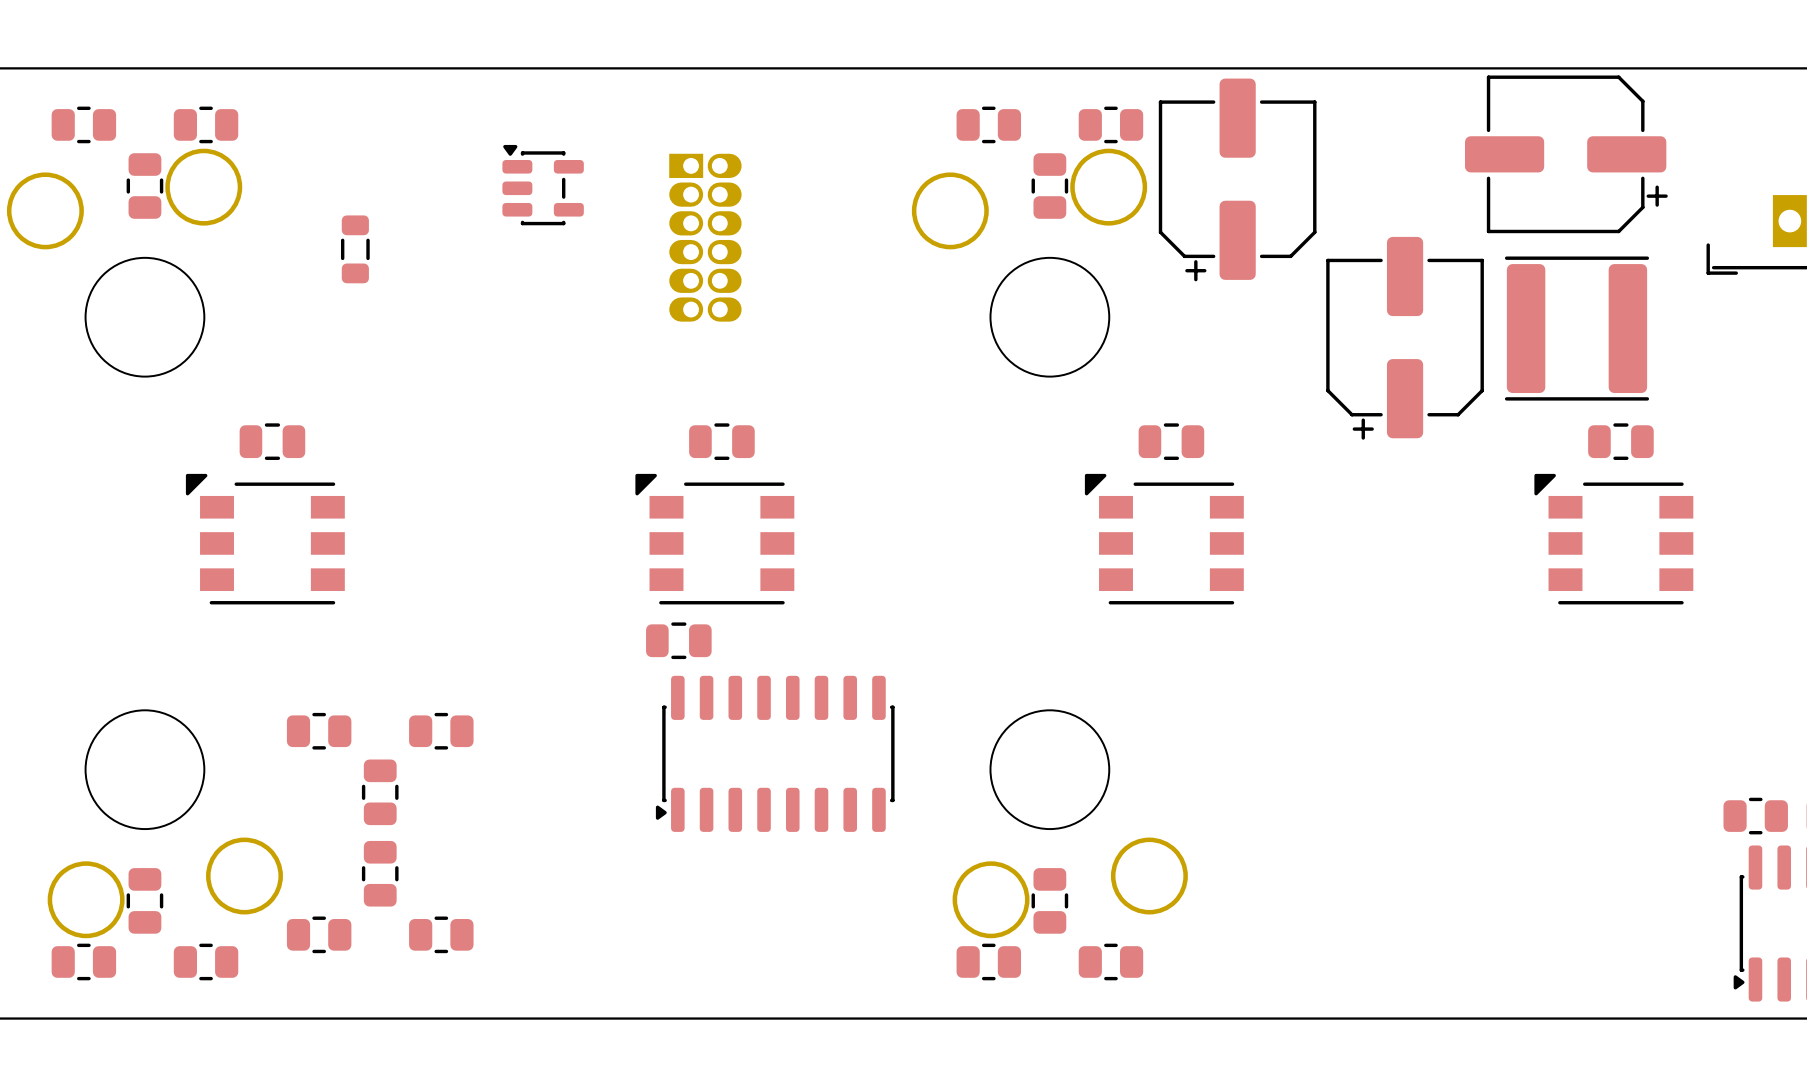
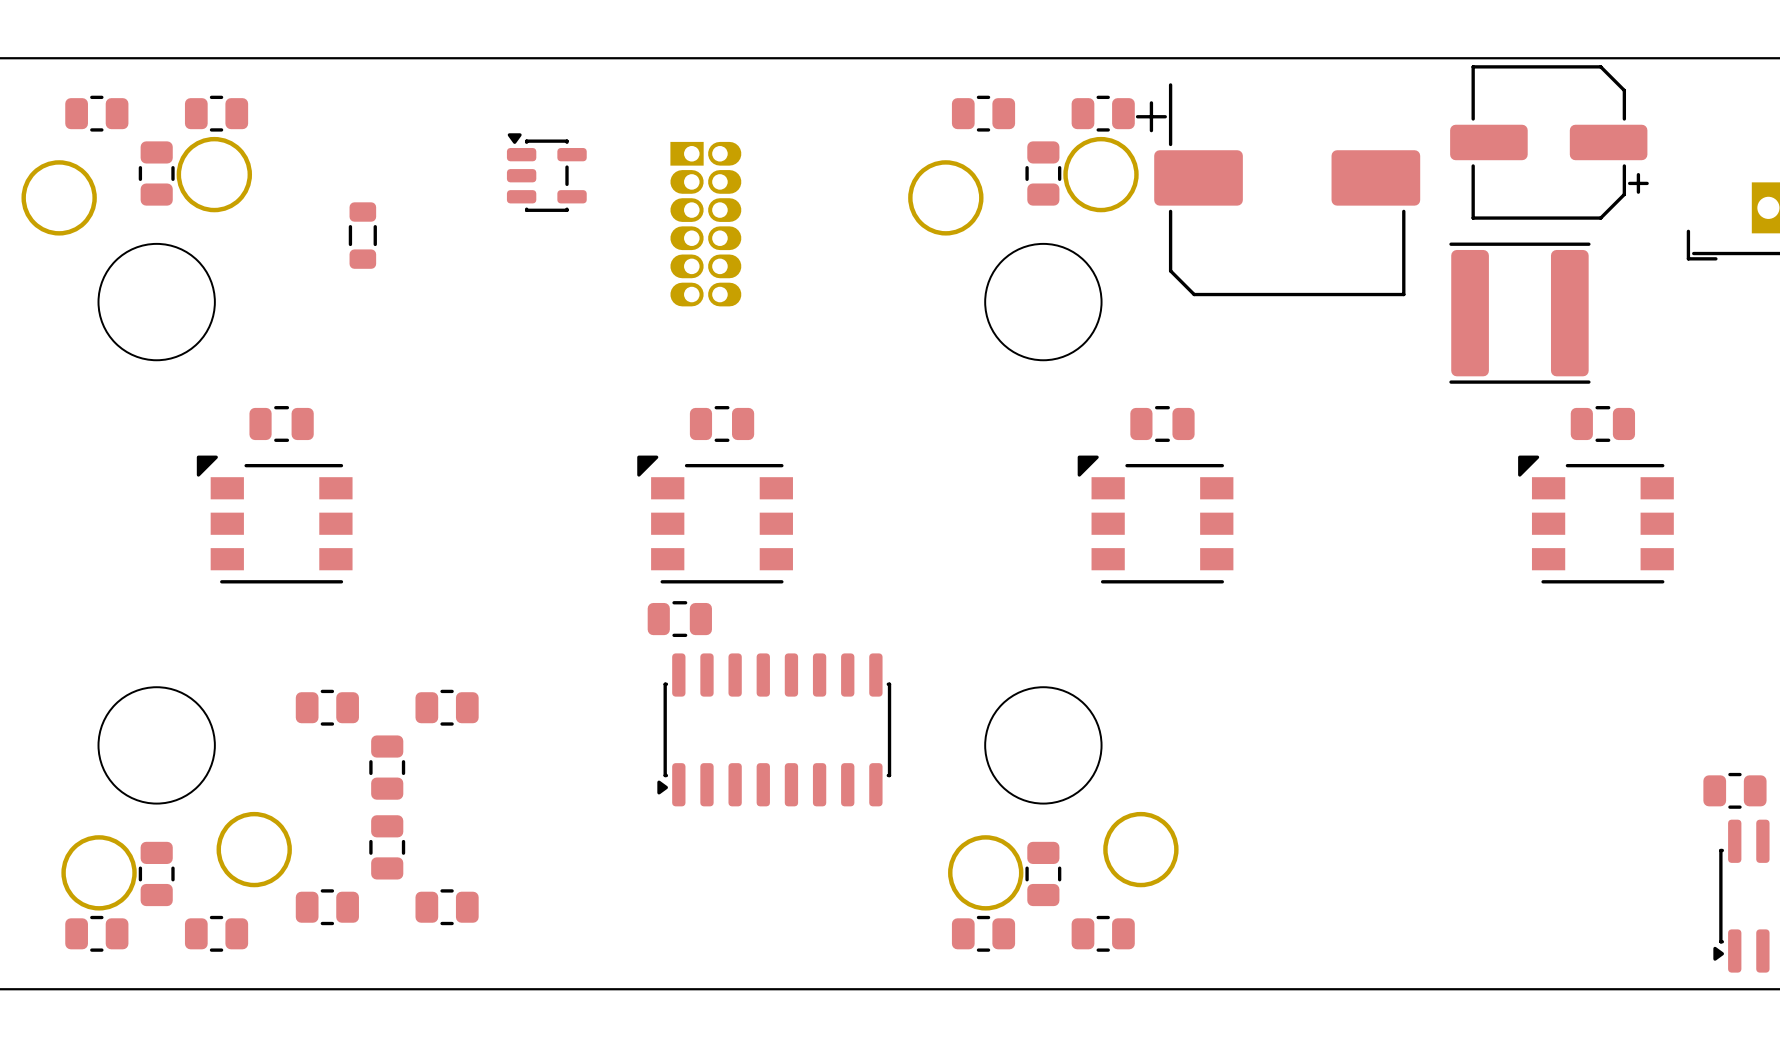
part: (1237, 179) -> none
part: none -> (1278, 189)
part position: (1576, 328) -> (1519, 313)
part: (1405, 338) -> none

